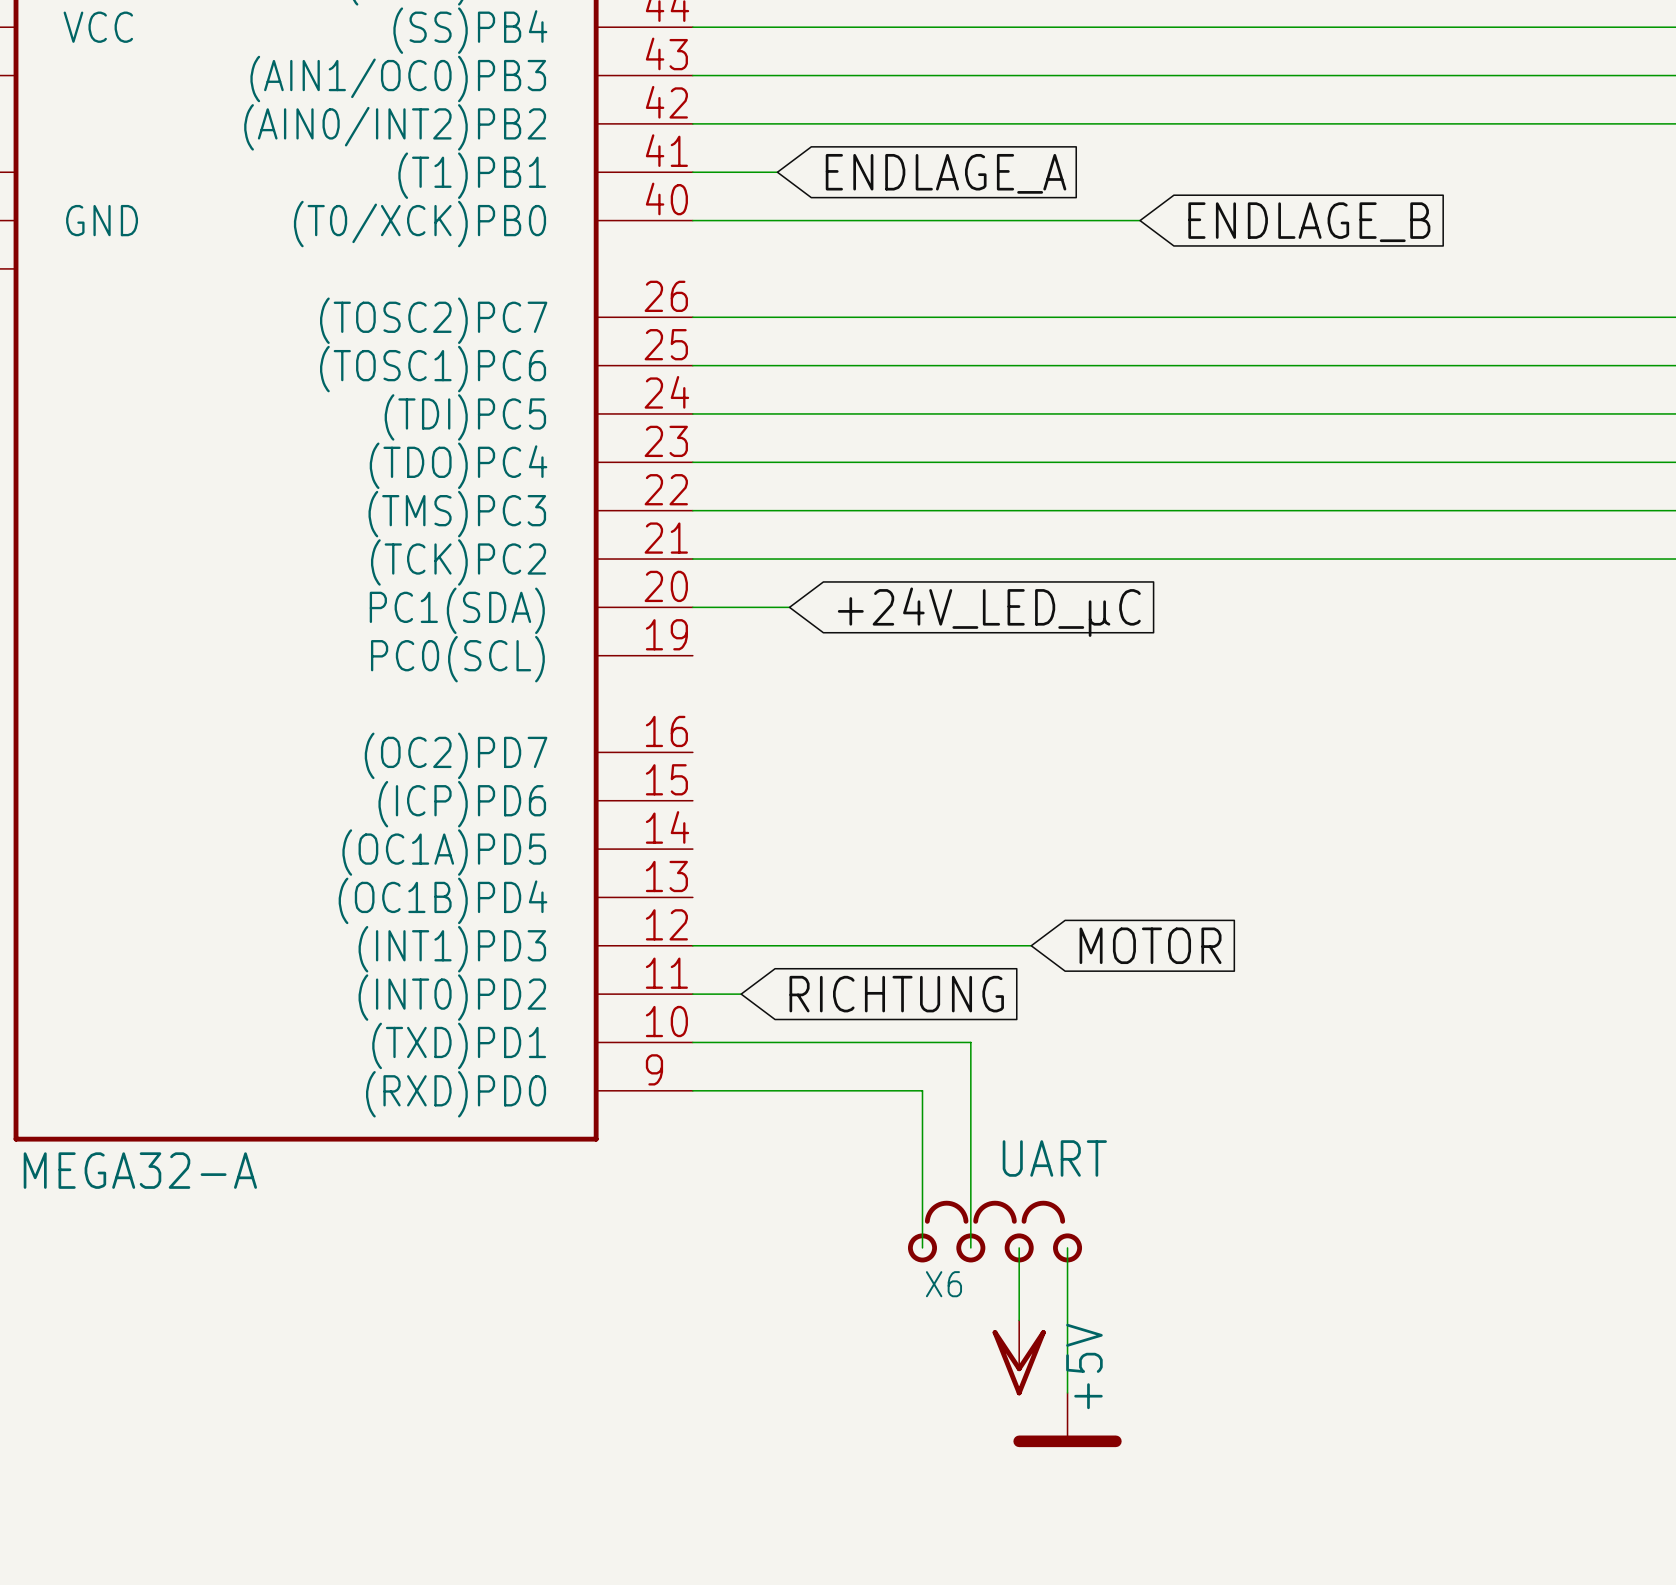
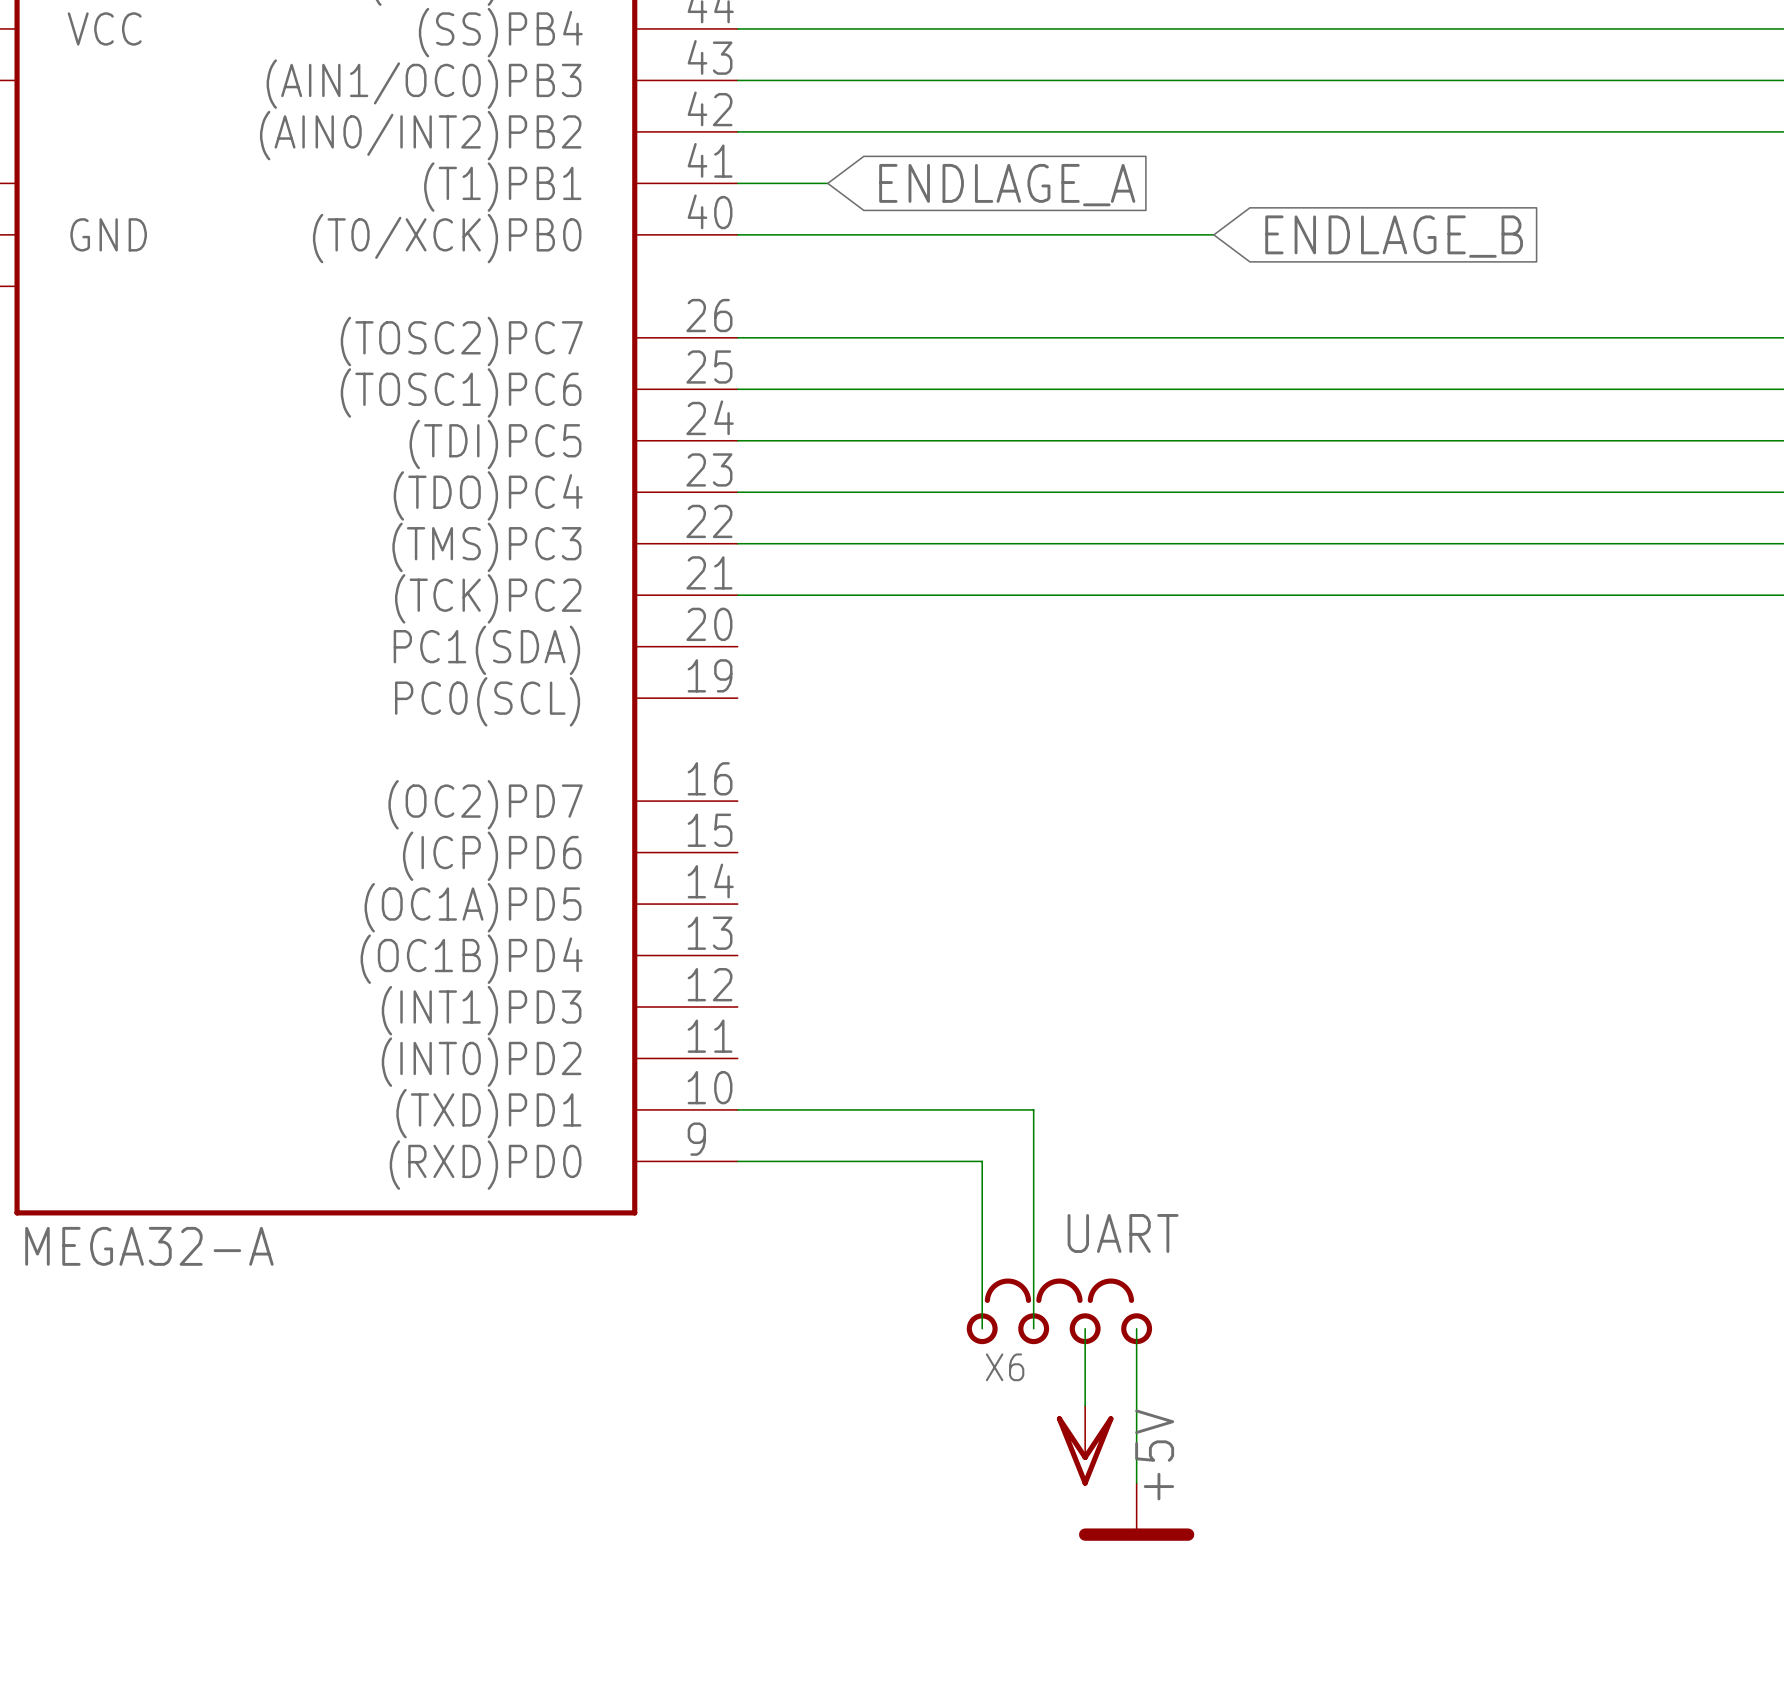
wire: (692, 607) (789, 607) -> none
global label: +24V_LED_µC (989, 612) -> none
wire: (692, 945) (1031, 945) -> none
global label: MOTOR (1150, 945) -> none
wire: (692, 994) (741, 994) -> none
global label: RICHTUNG (896, 994) -> none

